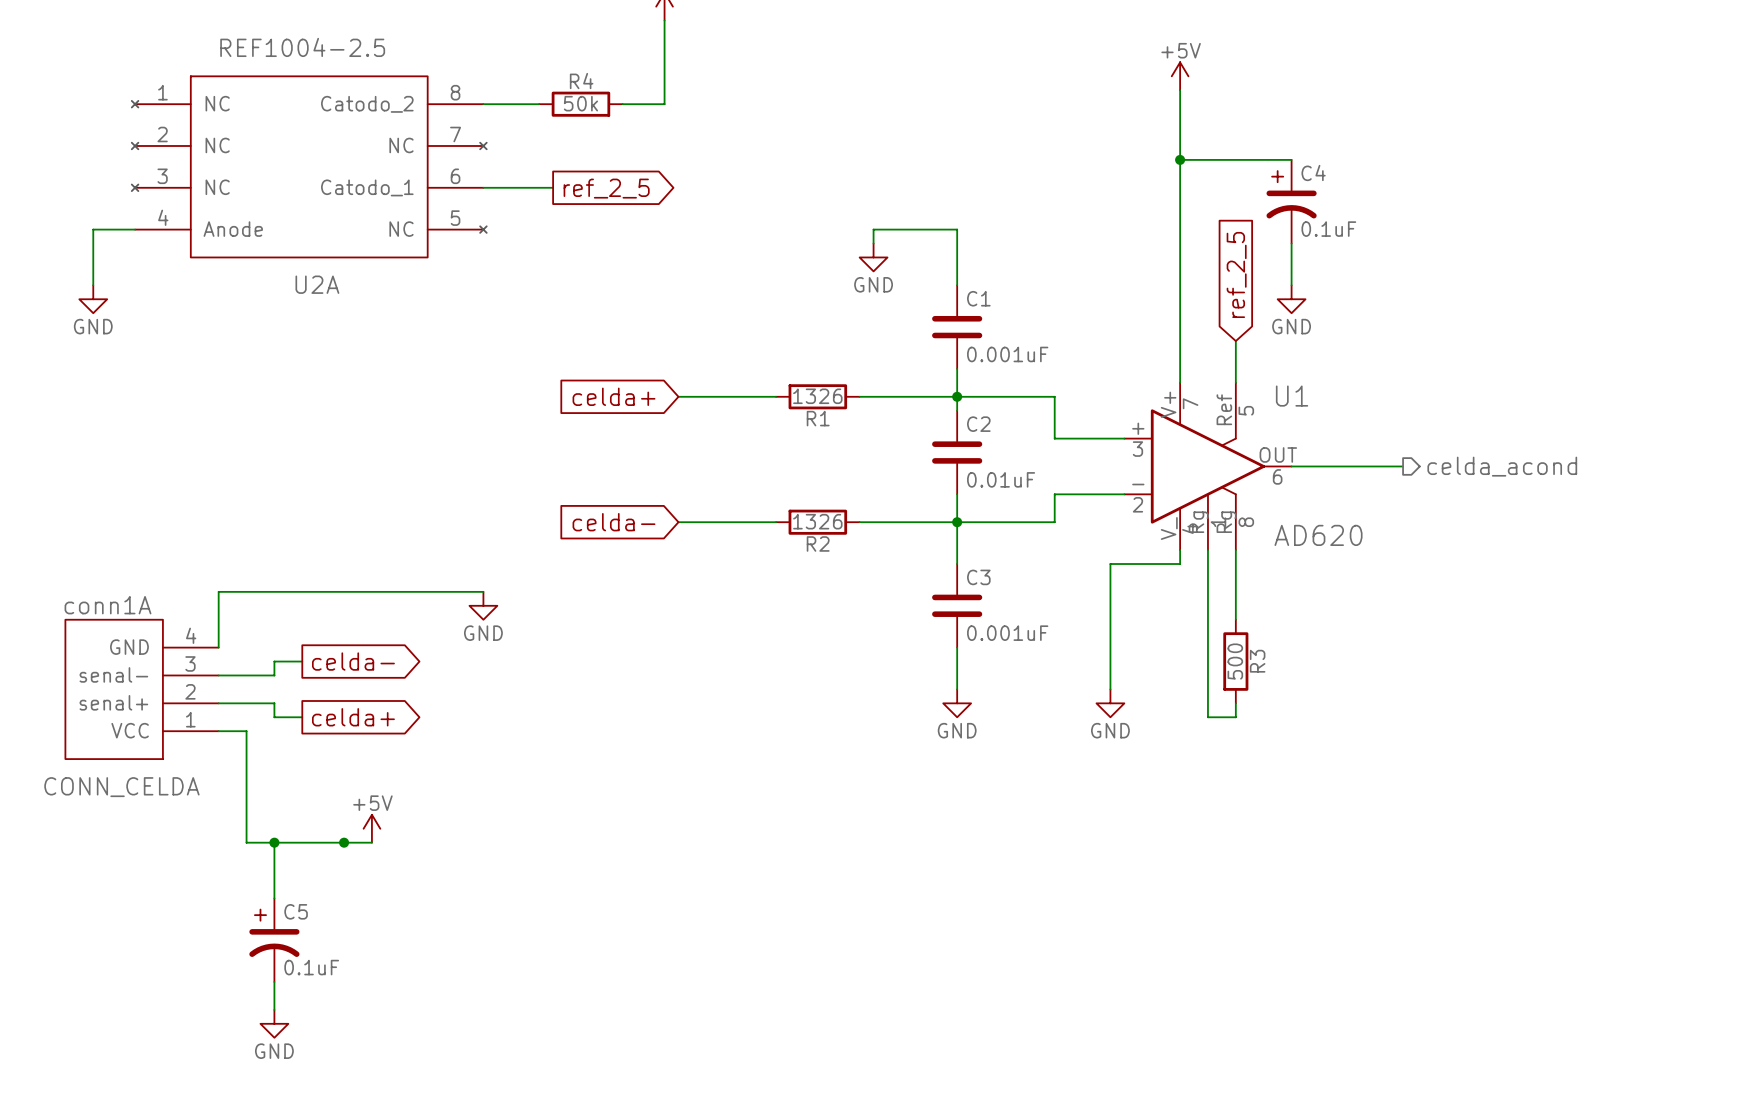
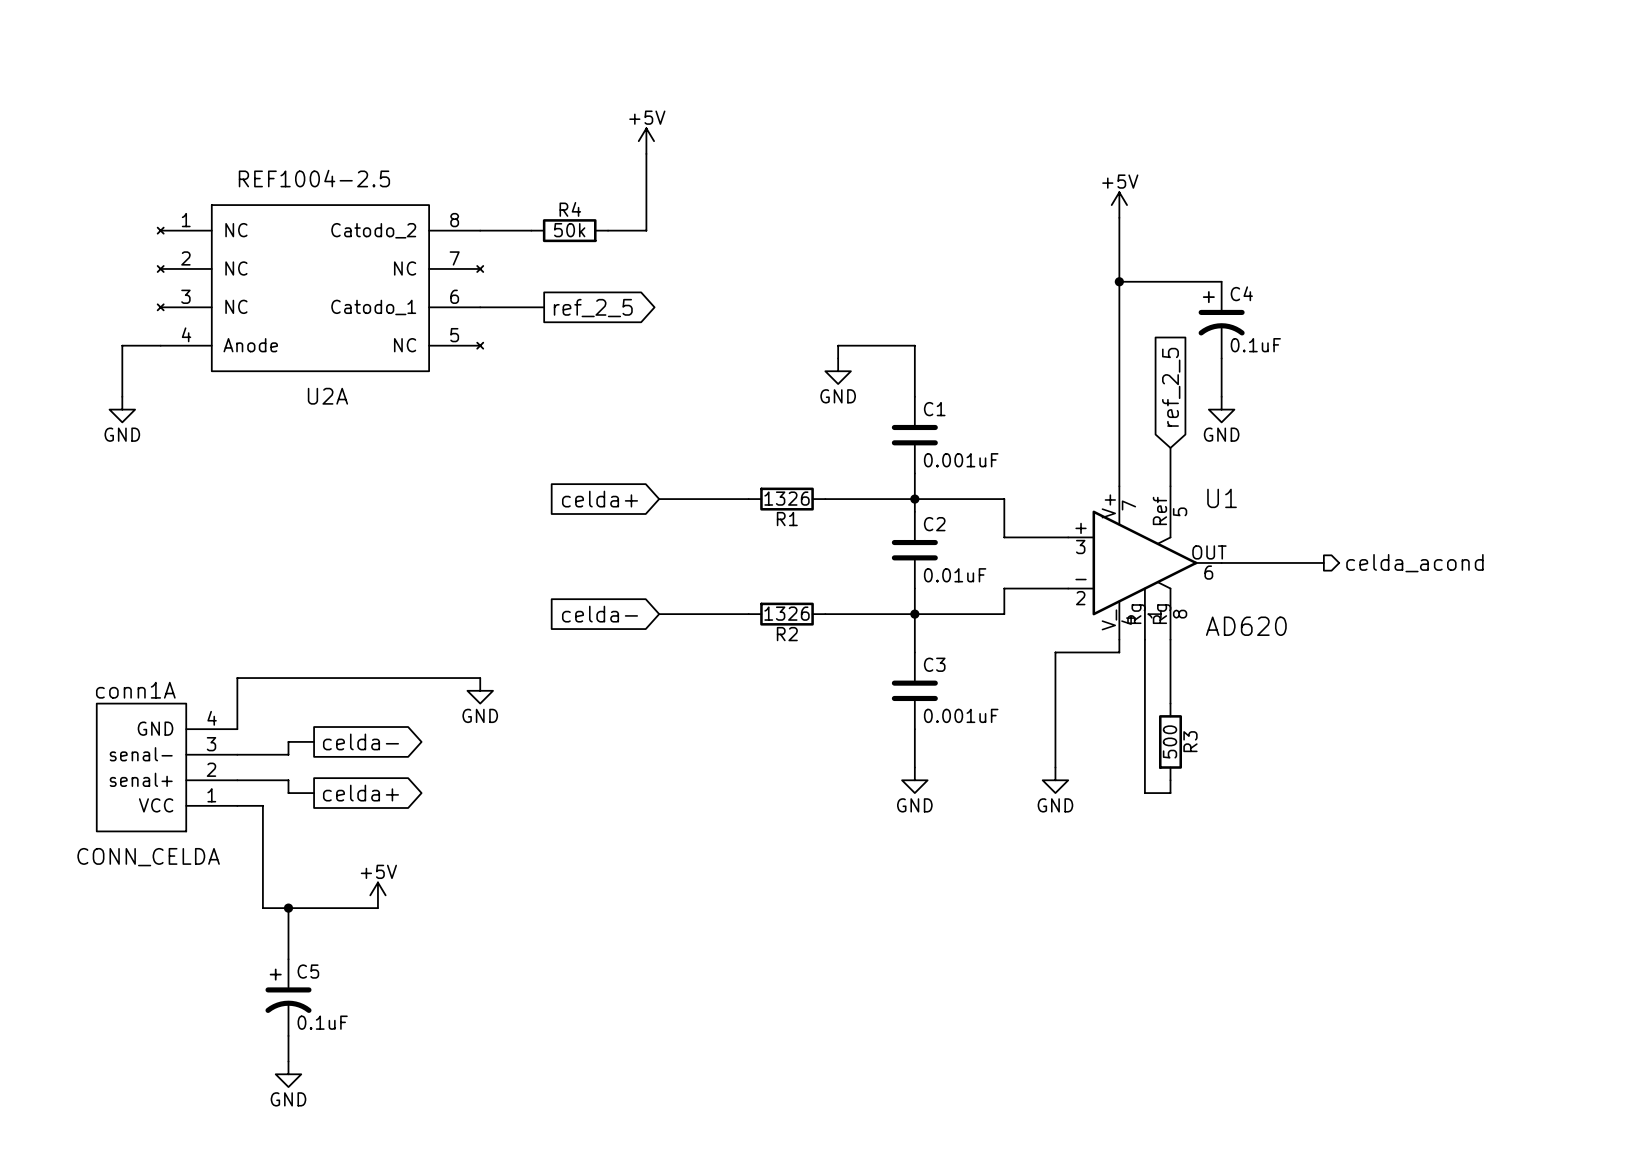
junction: (344, 842) -> none

